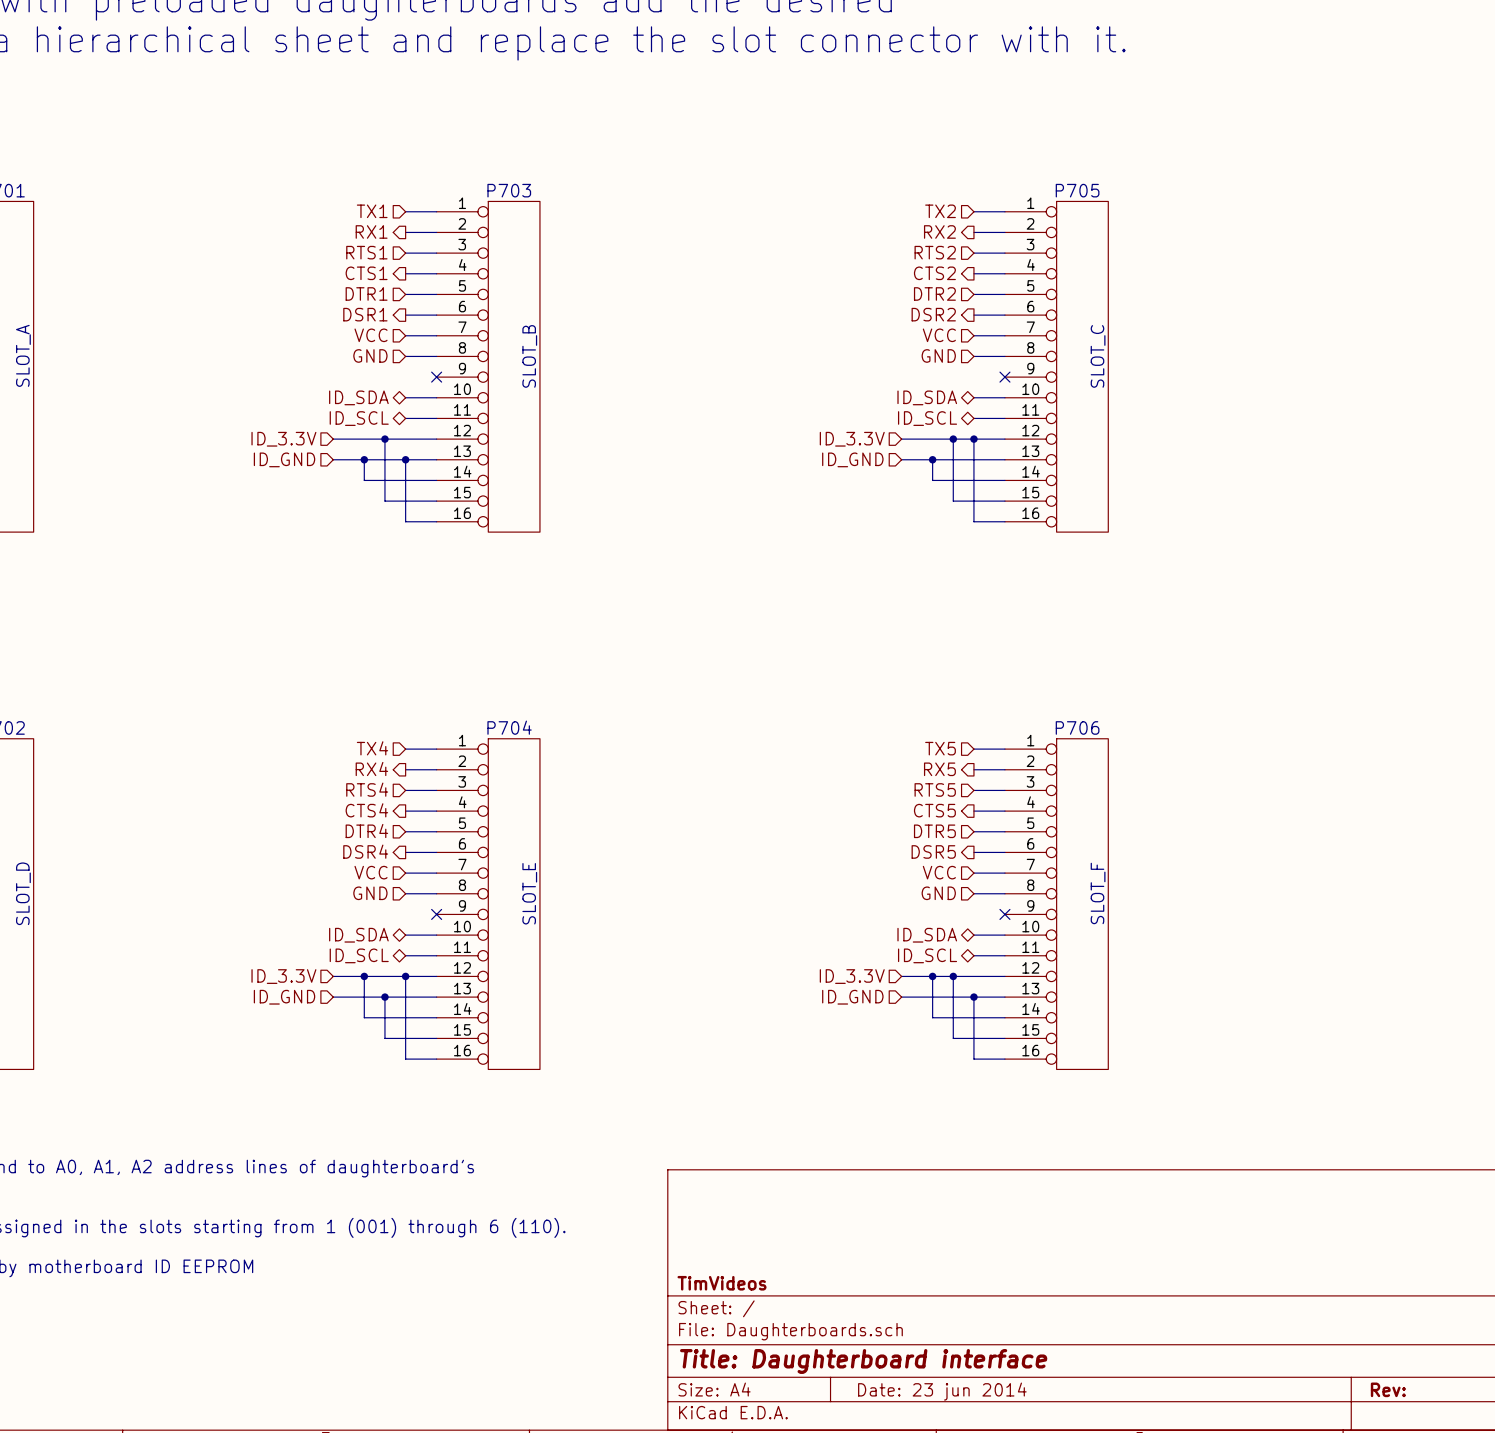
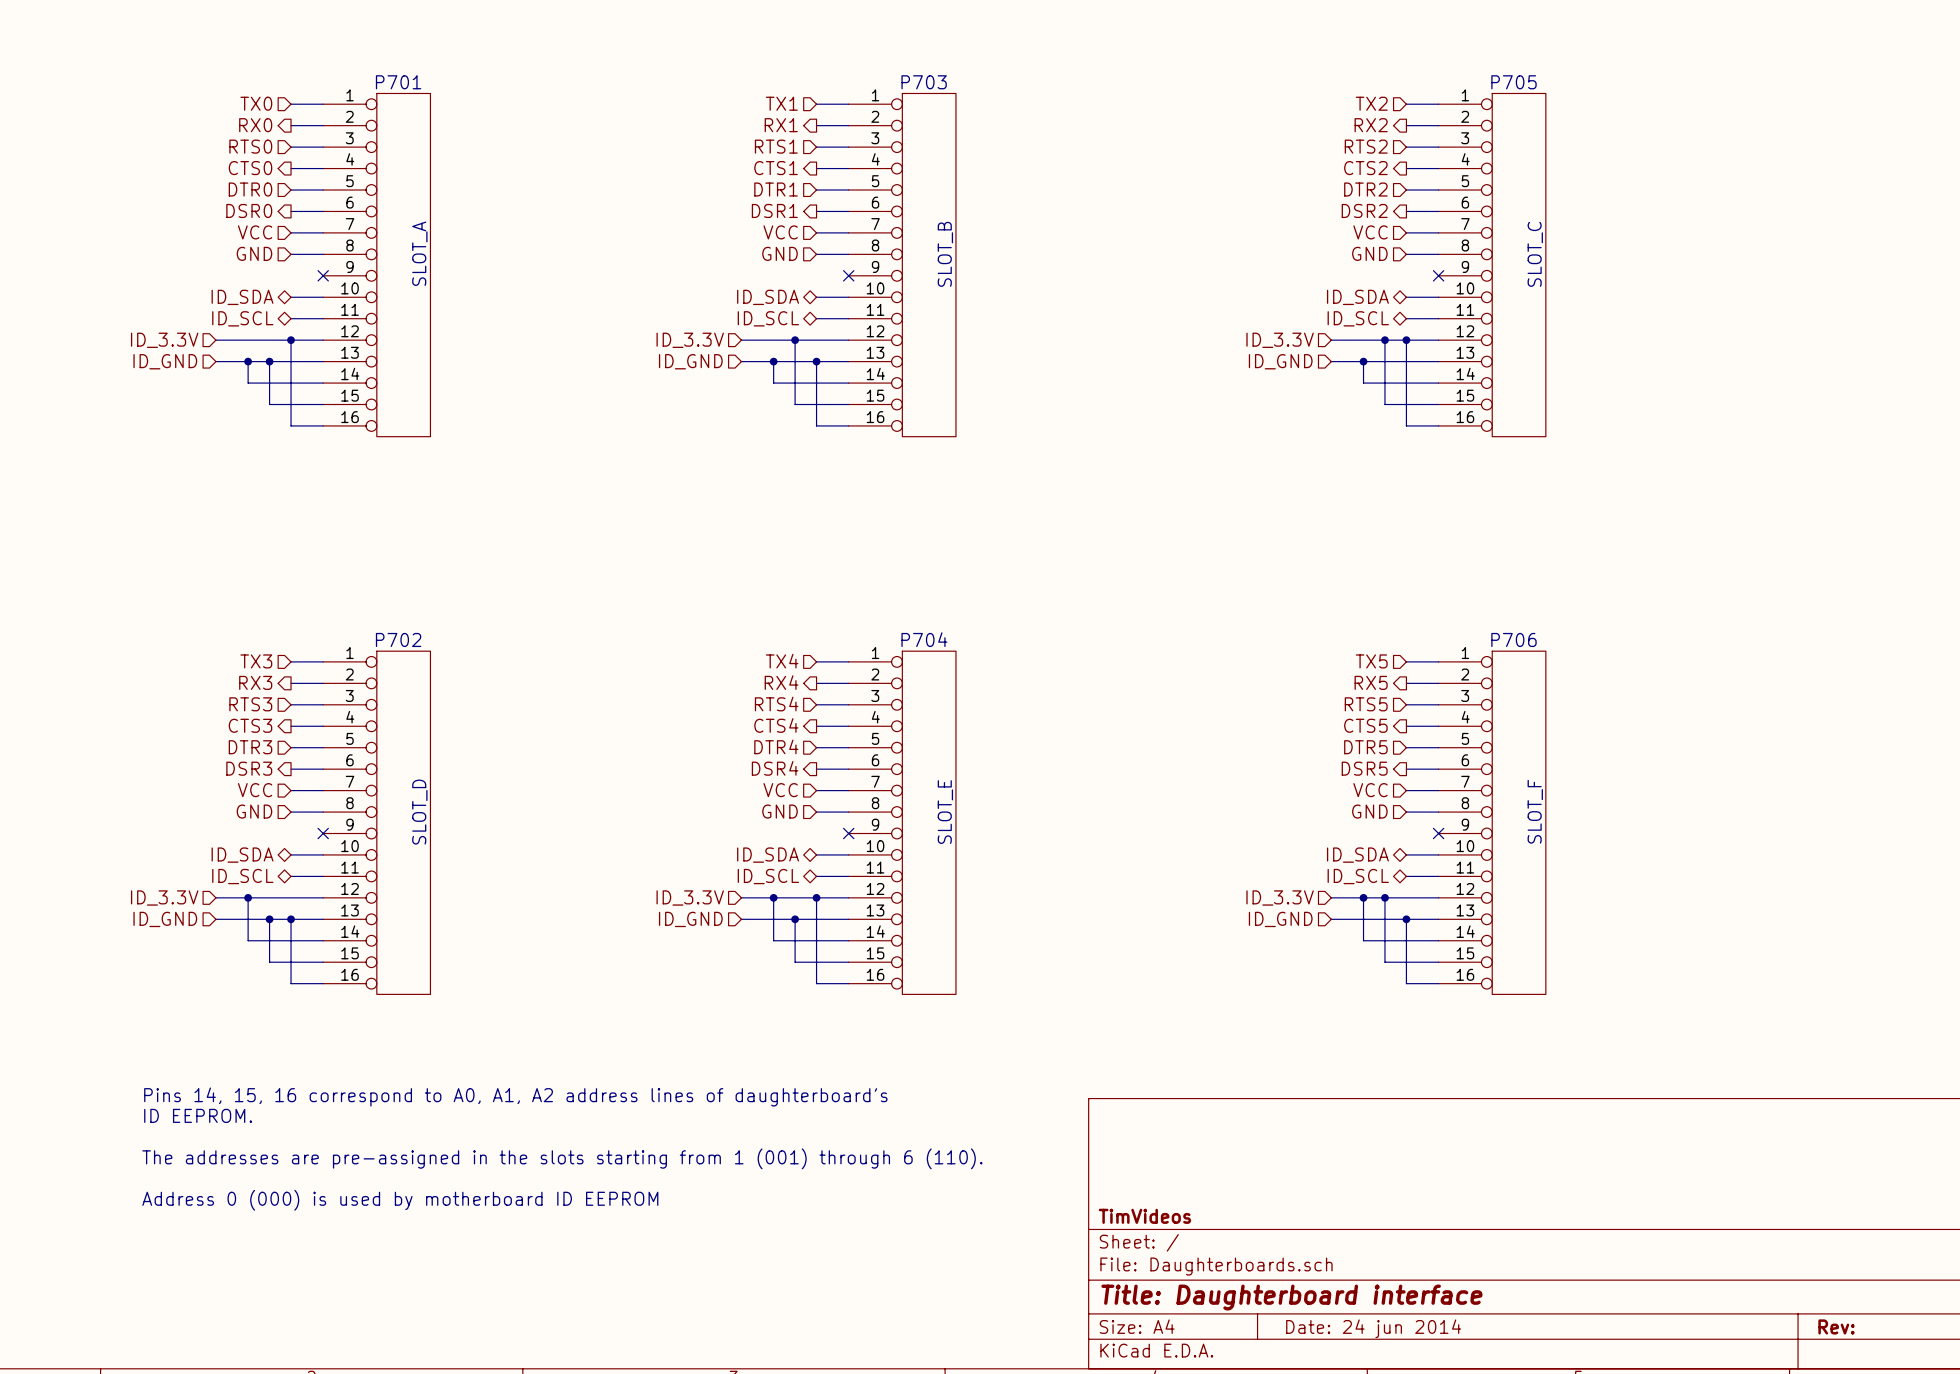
title block: Date: 23 jun 2014 (942, 1391) -> Date: 24 jun 2014 (1373, 1328)

